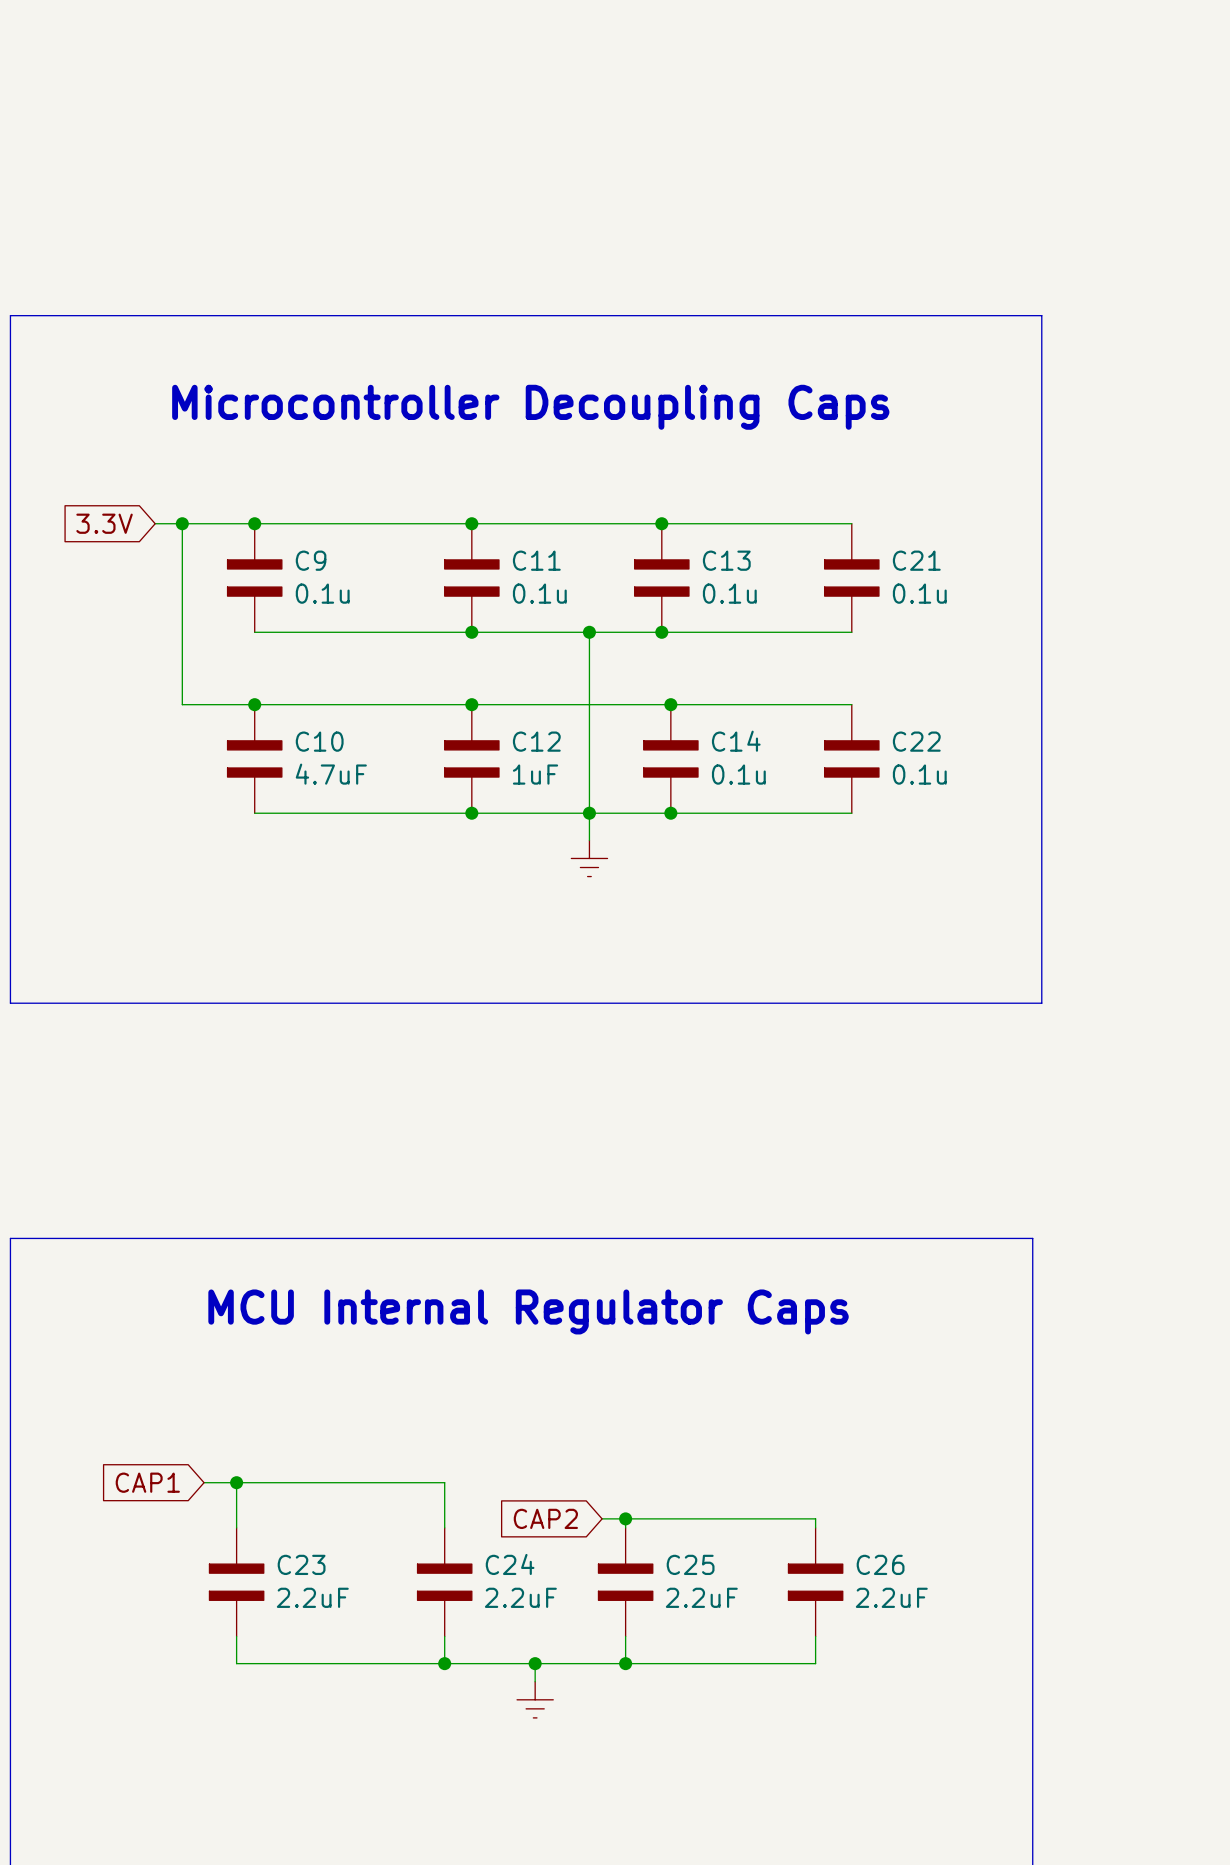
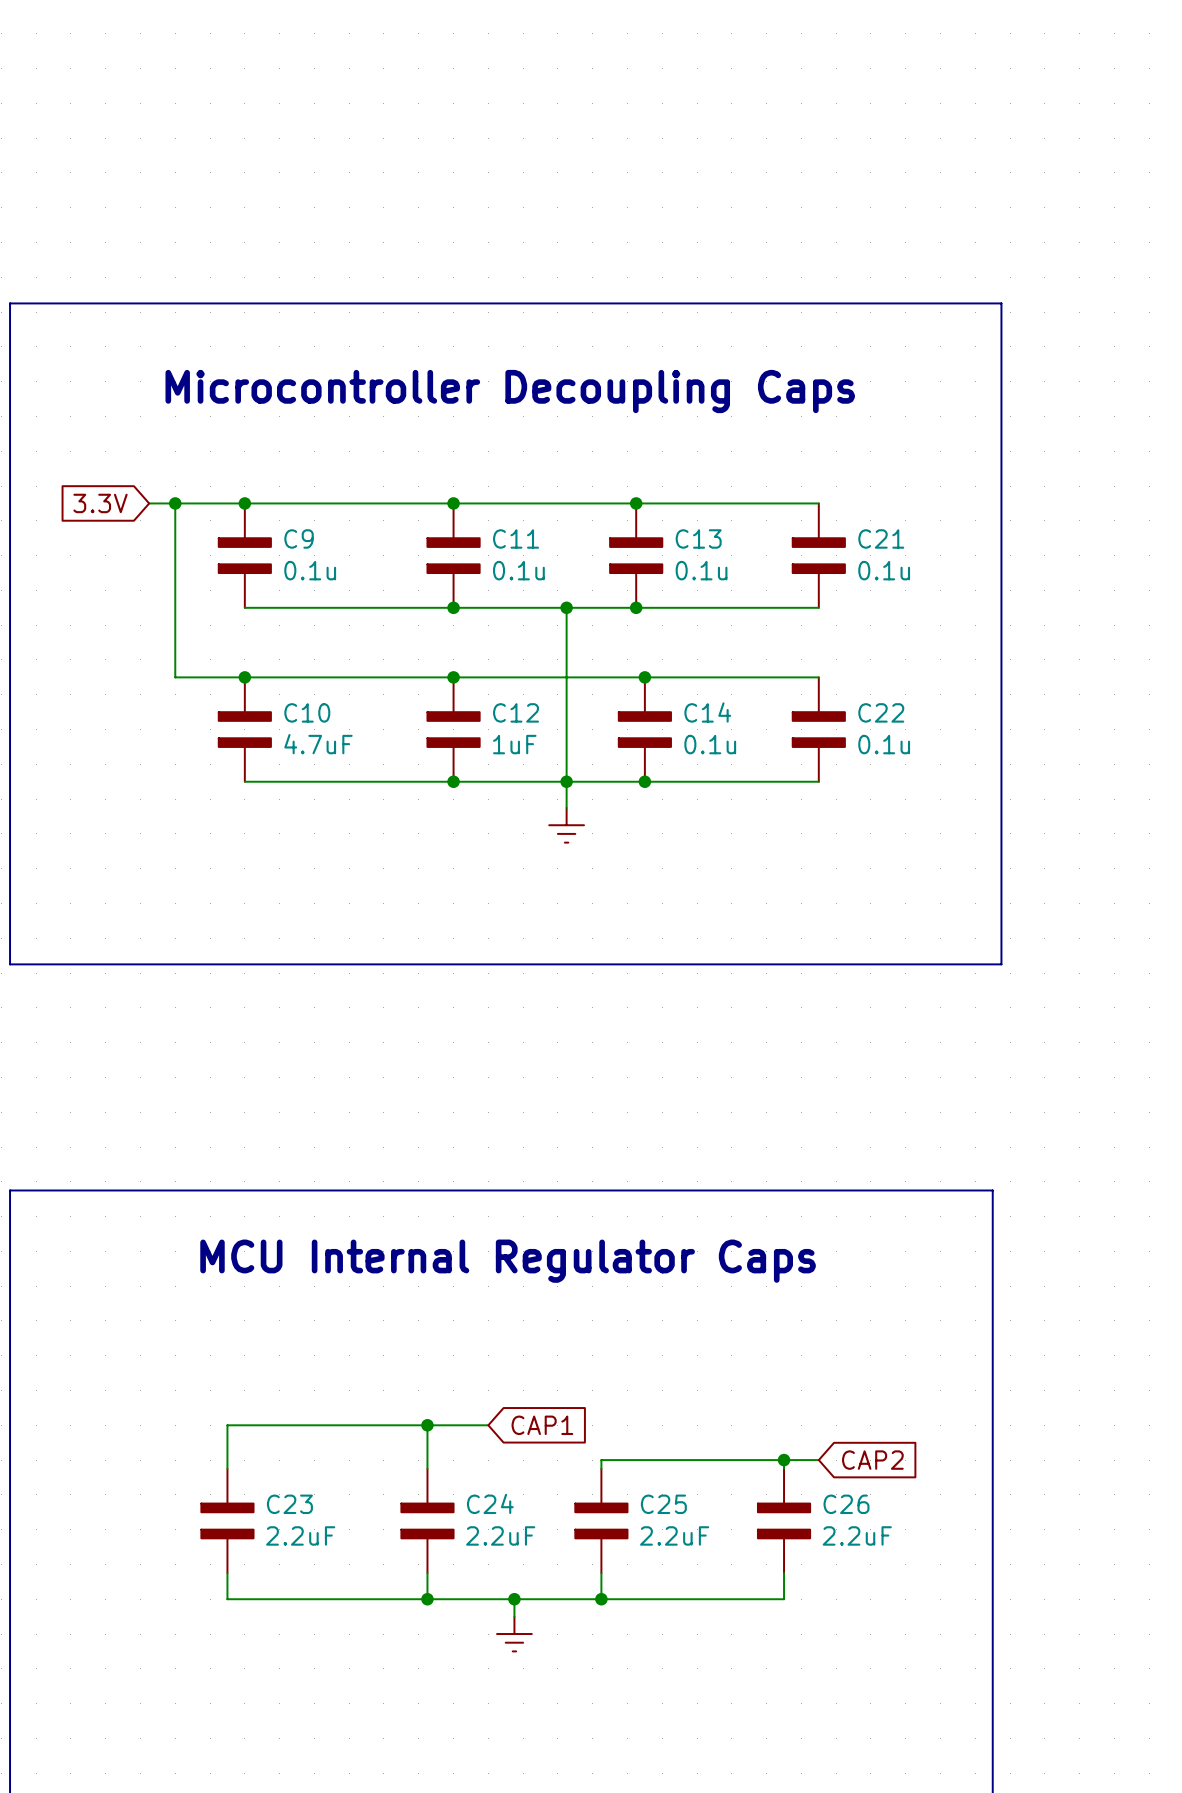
global label rotation: 0° (147, 1482) -> 180° (542, 1425)
global label position: CAP1 (147, 1482) -> CAP1 (542, 1425)
wire: (204, 1482) (236, 1482) -> none
junction: (236, 1482) -> none
wire: none -> (427, 1425) (488, 1425)
junction: none -> (427, 1425)
global label rotation: 0° (545, 1518) -> 180° (872, 1460)
global label position: CAP2 (545, 1518) -> CAP2 (872, 1460)
wire: (602, 1518) (625, 1518) -> none
junction: (625, 1518) -> none
wire: none -> (784, 1460) (818, 1460)
junction: none -> (784, 1460)

